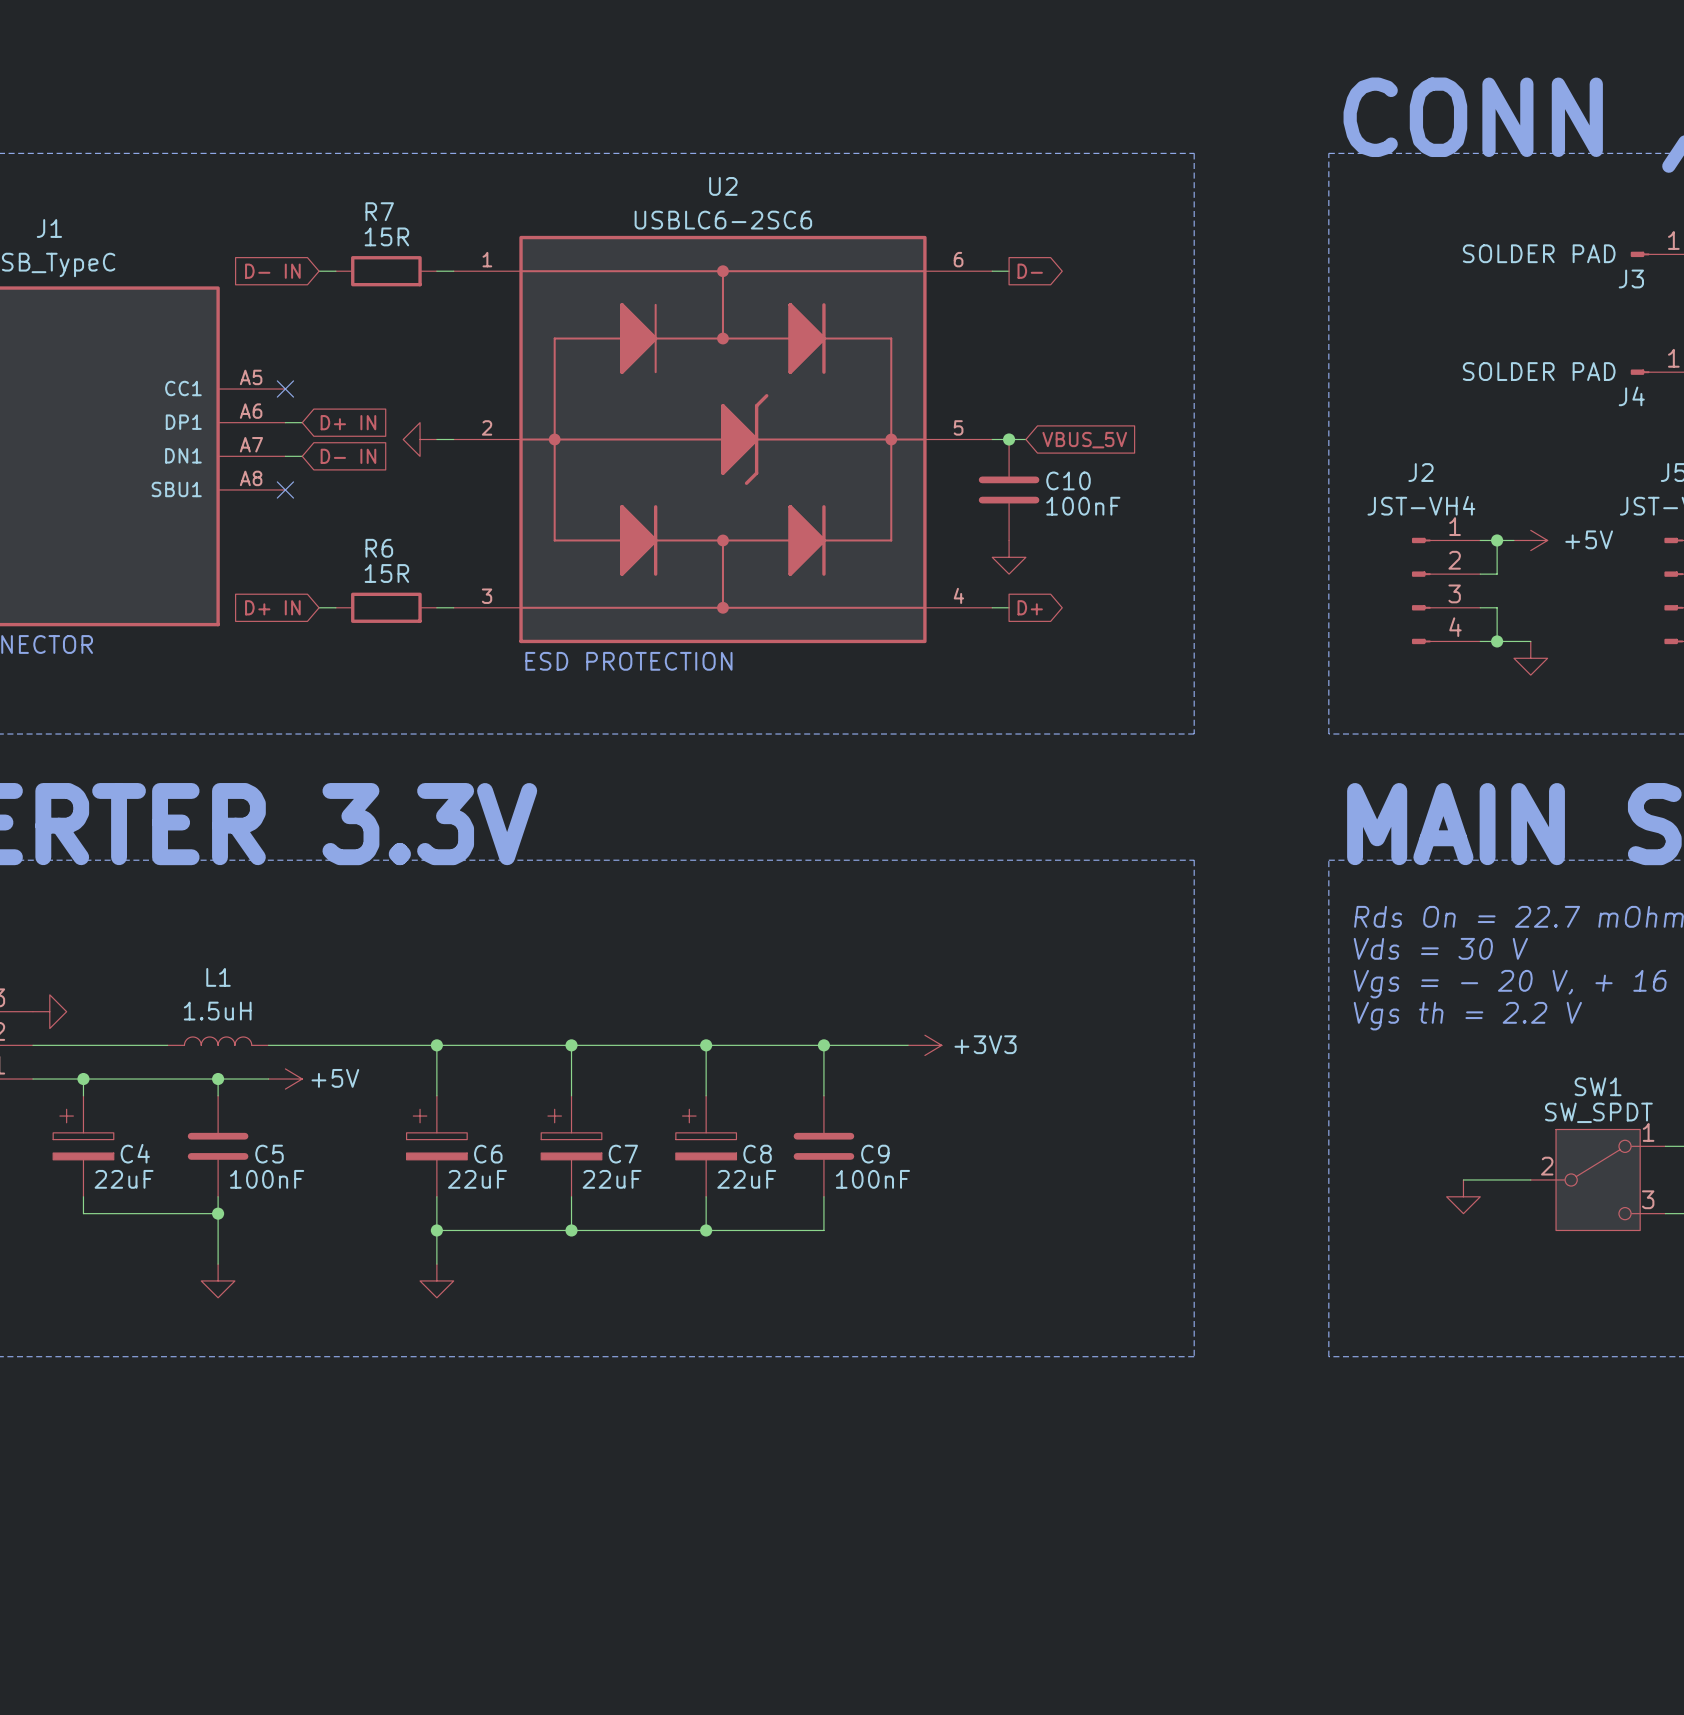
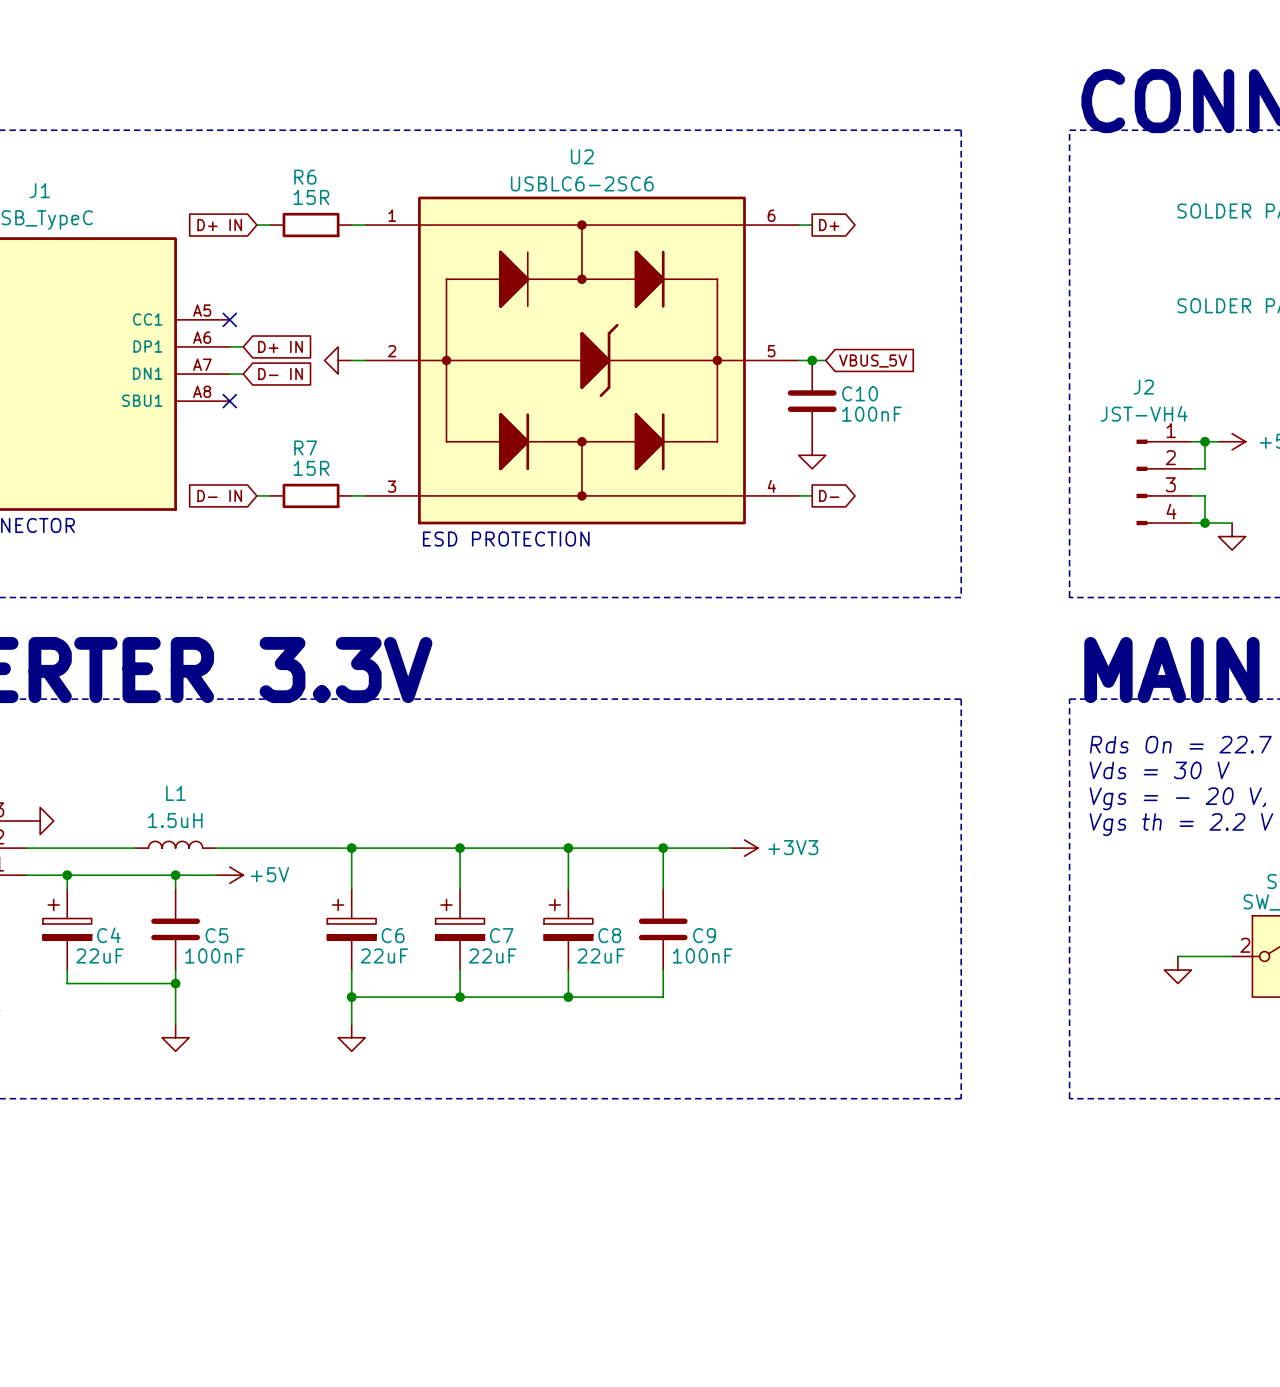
R7 name: R7 (379, 211) -> R6 (305, 177)
global label: D- IN (272, 271) -> D+ IN (219, 225)
global label: D- (1030, 271) -> D+ (829, 225)
R6 name: R6 (379, 548) -> R7 (305, 448)
global label: D+ IN (272, 607) -> D- IN (219, 495)
global label: D+ (1030, 607) -> D- (829, 495)

